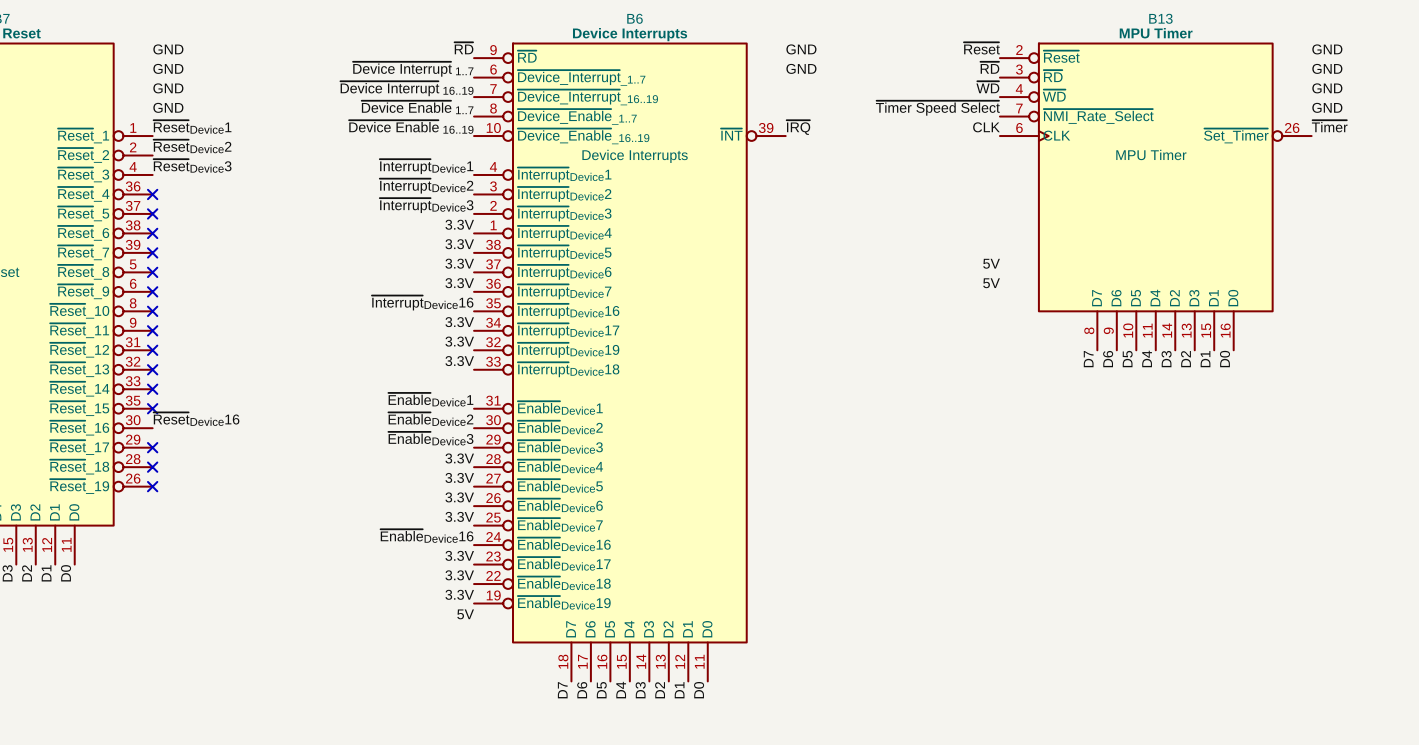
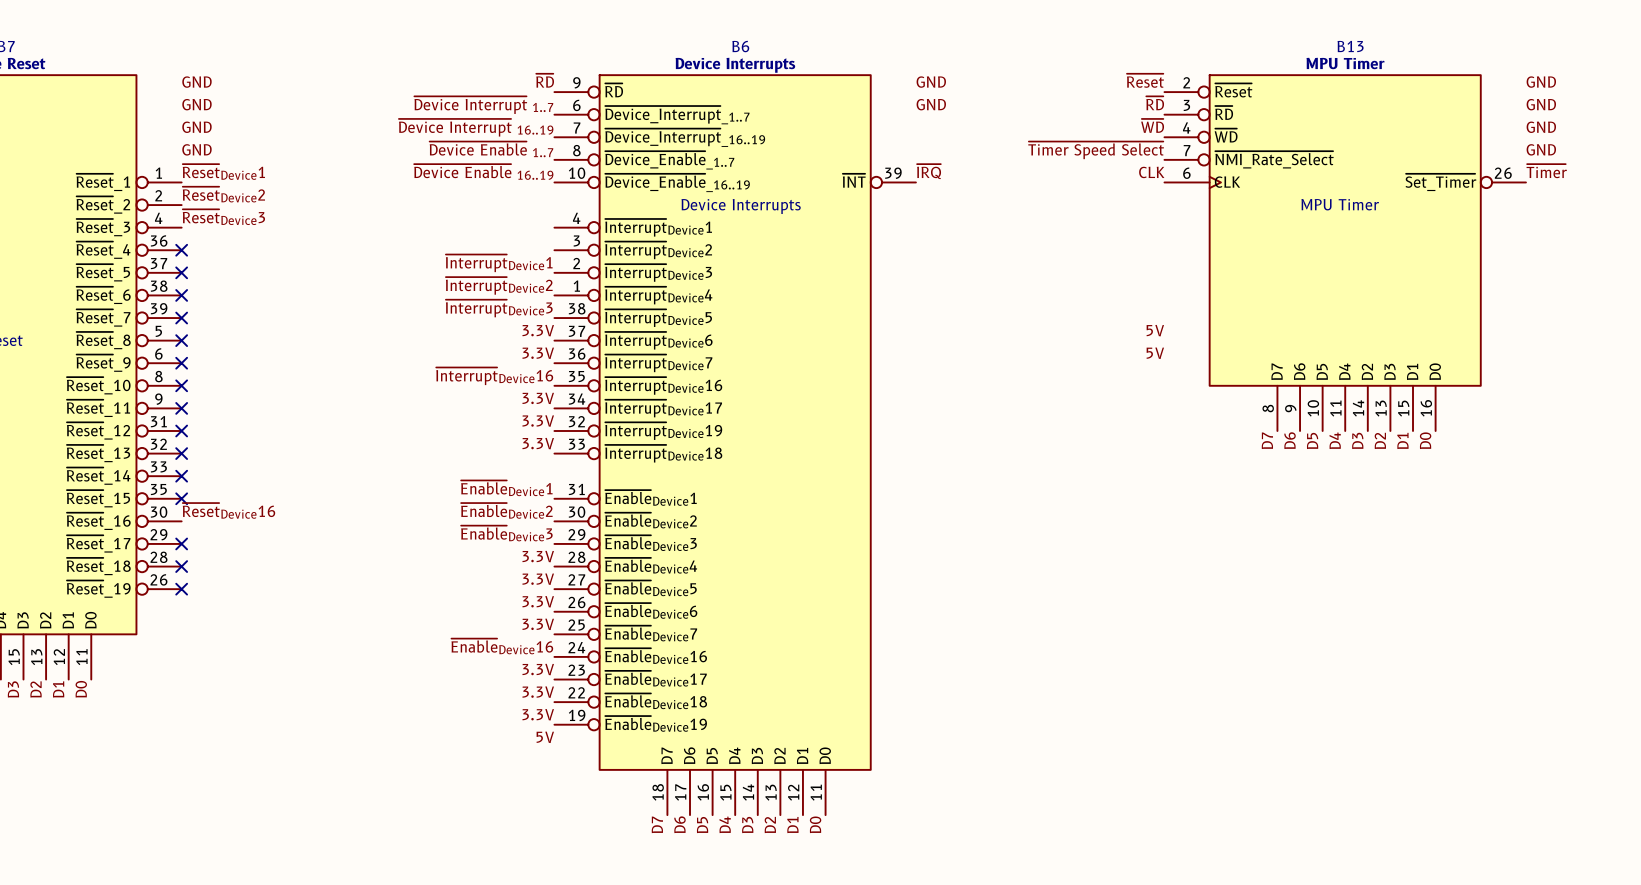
label: ~{Interrupt}Device1 (426, 166) -> none
label: ~{Interrupt}Device2 (426, 186) -> none
label: ~{Interrupt}Device3 (426, 205) -> ~{Interrupt}Device1 (499, 263)
label: 3.3V (459, 224) -> ~{Interrupt}Device2 (499, 285)
label: 3.3V (459, 244) -> ~{Interrupt}Device3 (499, 308)

